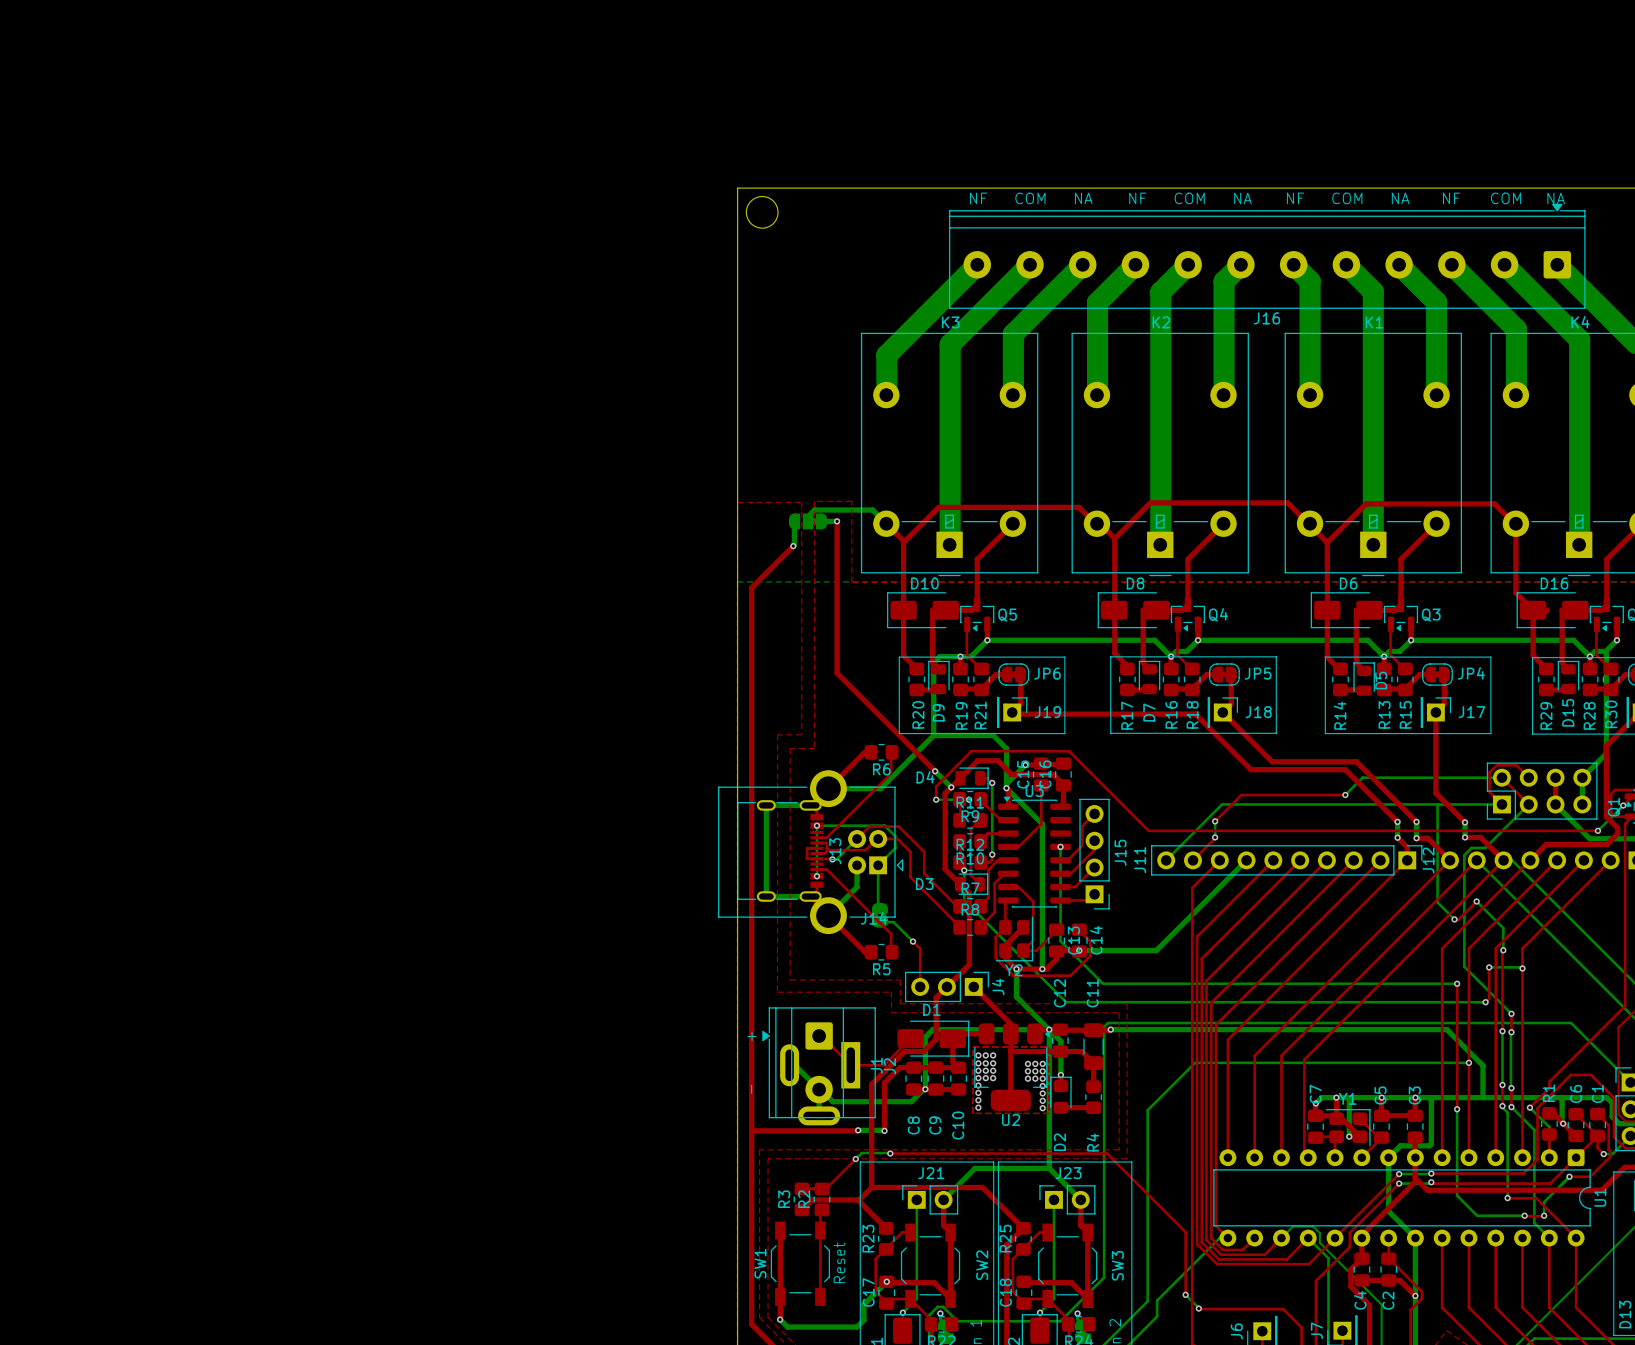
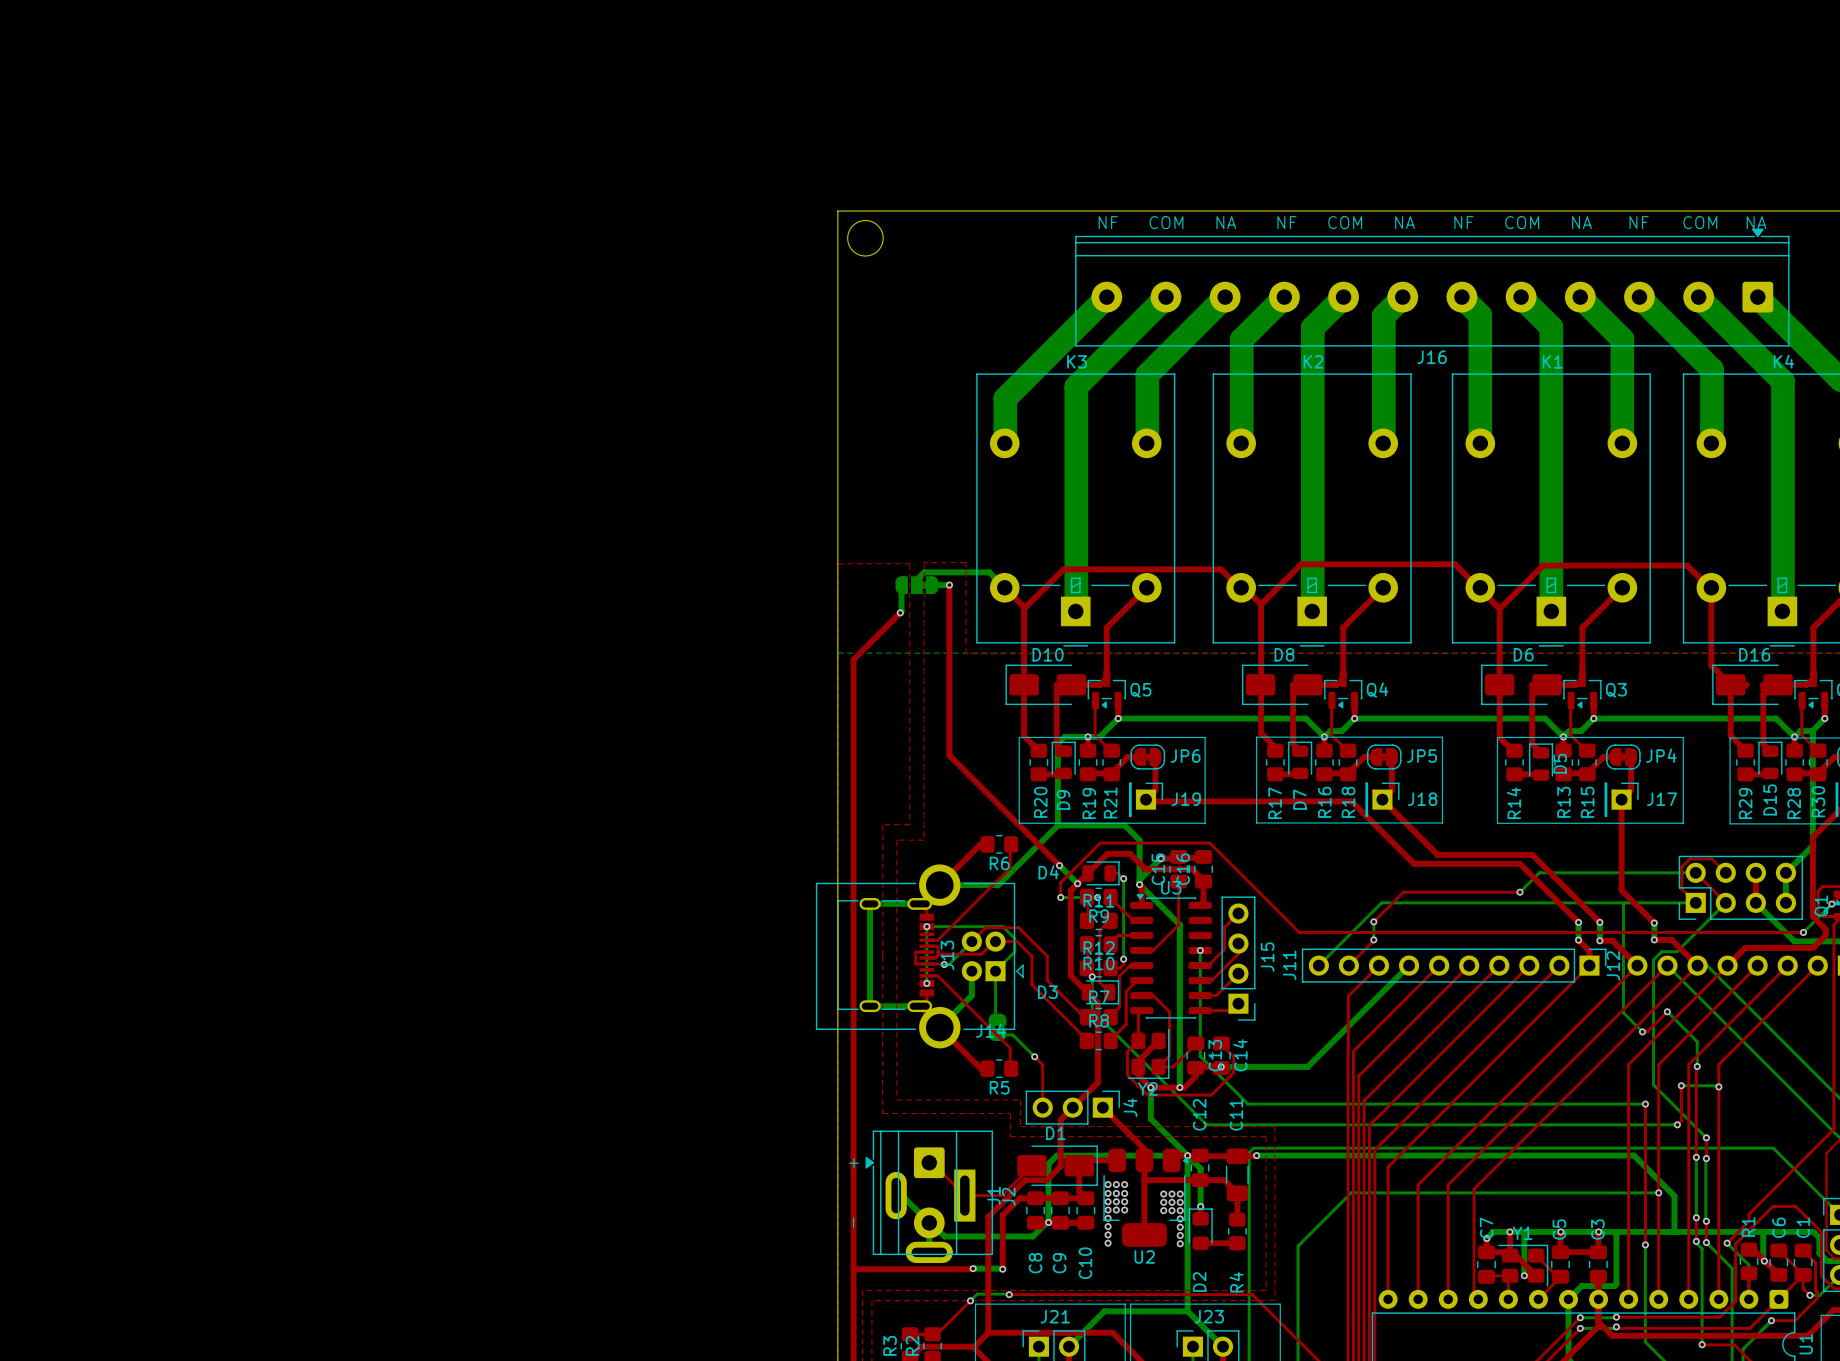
top zone outline: (973, 1047) (1048, 1047) (1049, 1113) (973, 1113) (973, 1047) -> none

